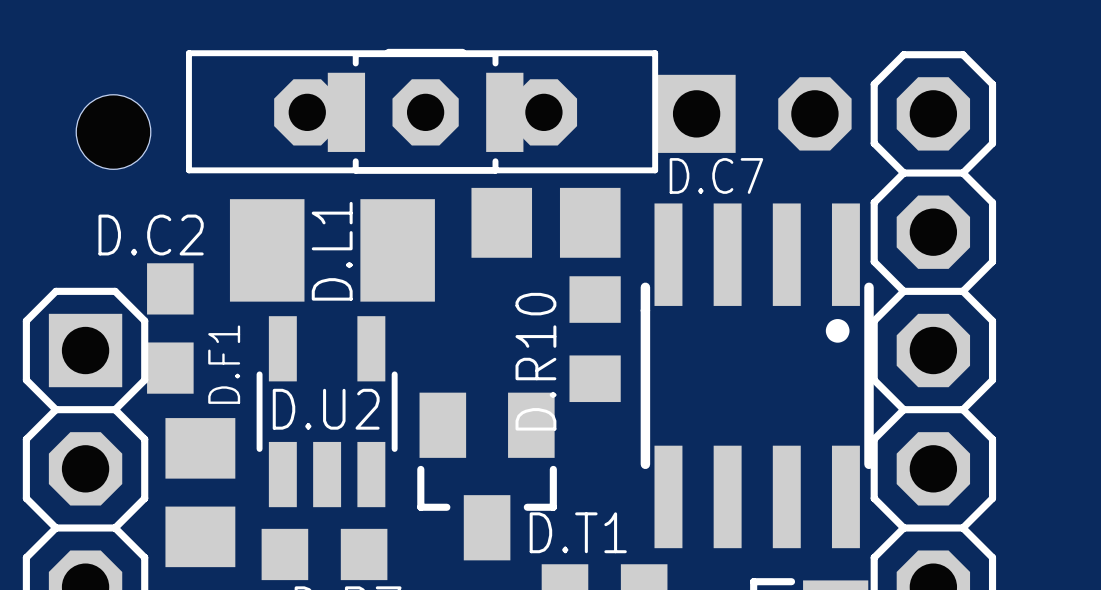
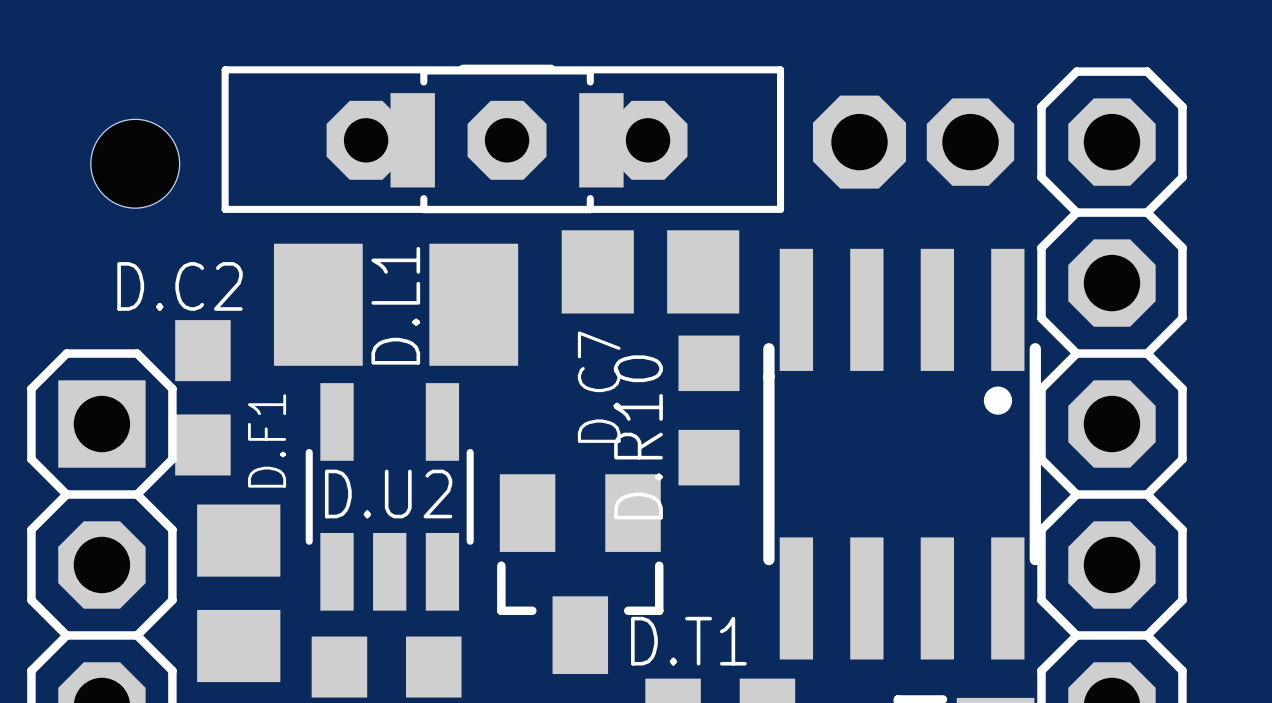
part footprint: [657, 74, 852, 153] -> [812, 95, 1015, 189]
D.C7 name rotation: 0° (716, 175) -> 90° counterclockwise (599, 387)
D.C7 name position: D.C7 (716, 175) -> D.C7 (599, 387)

